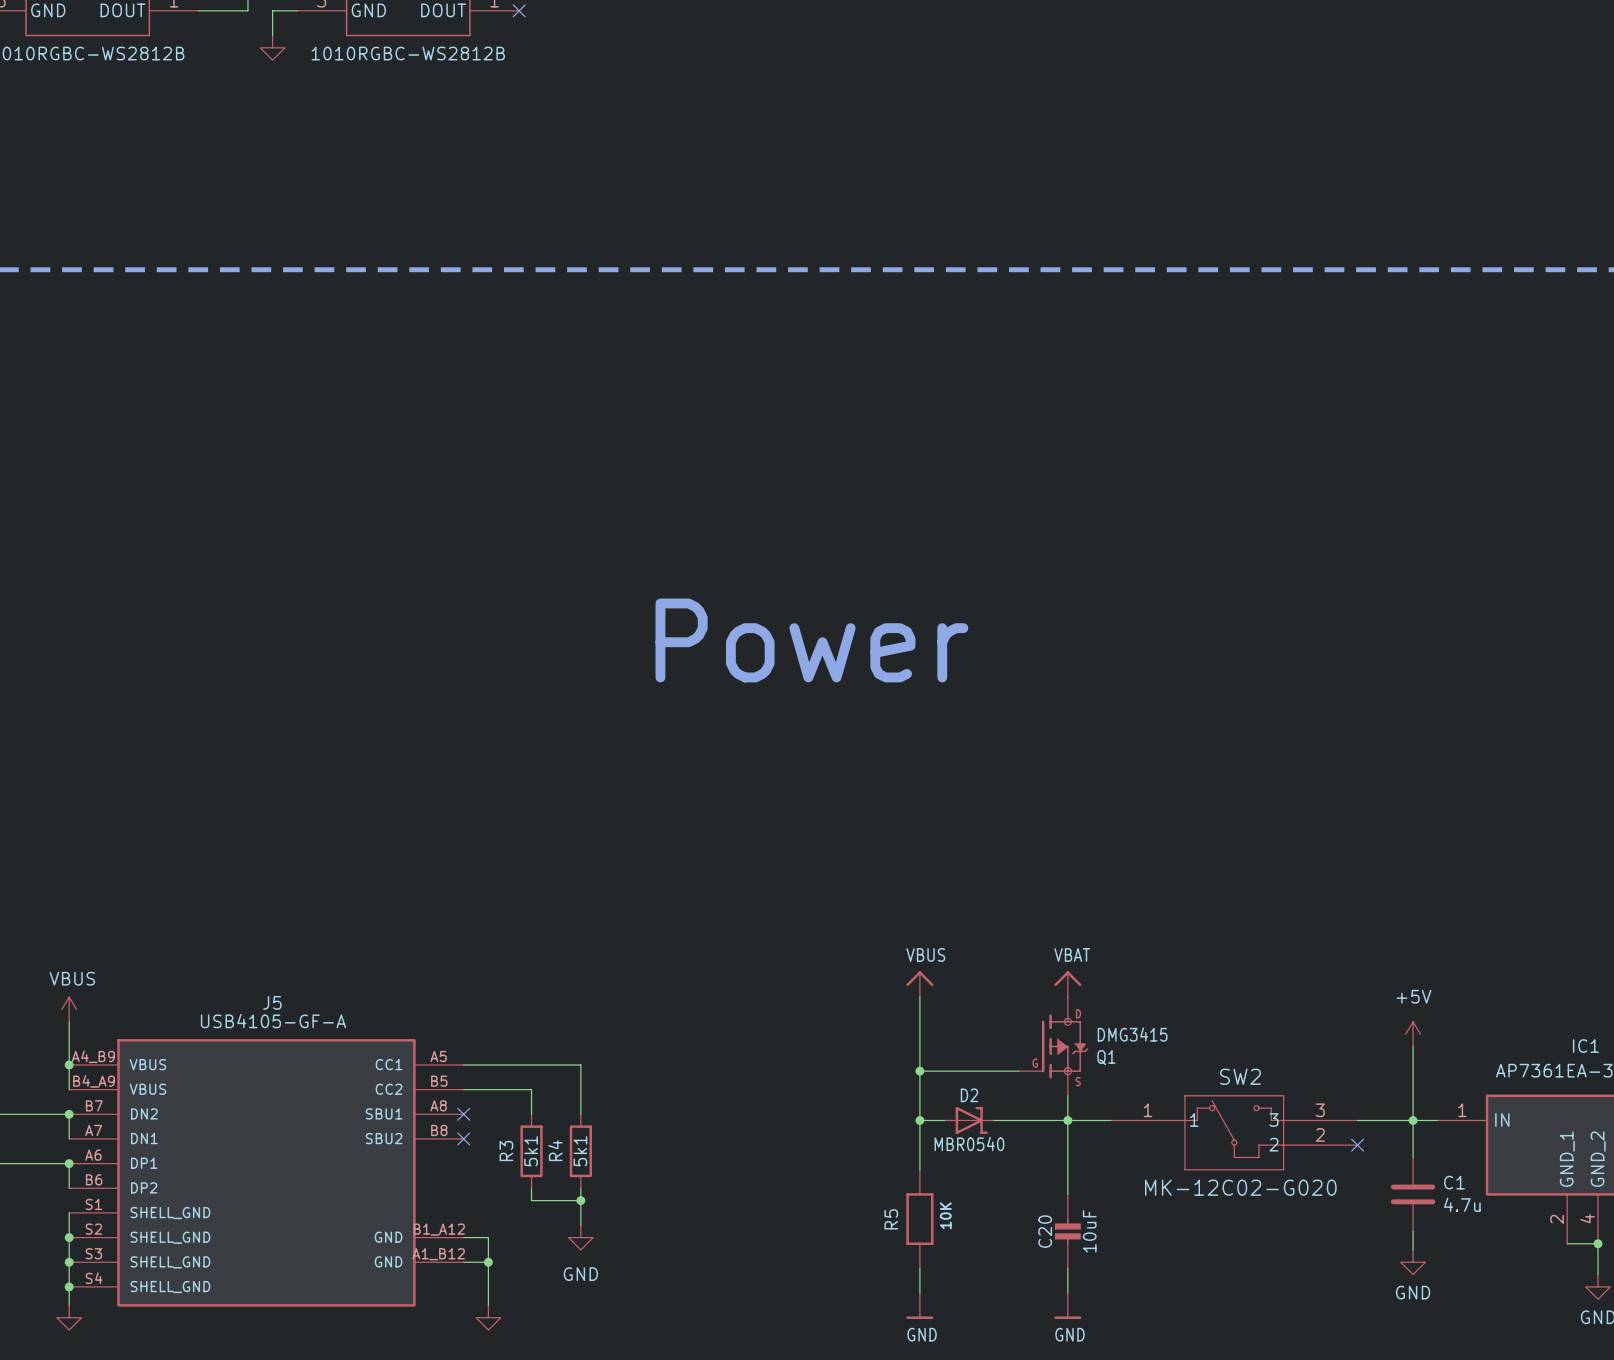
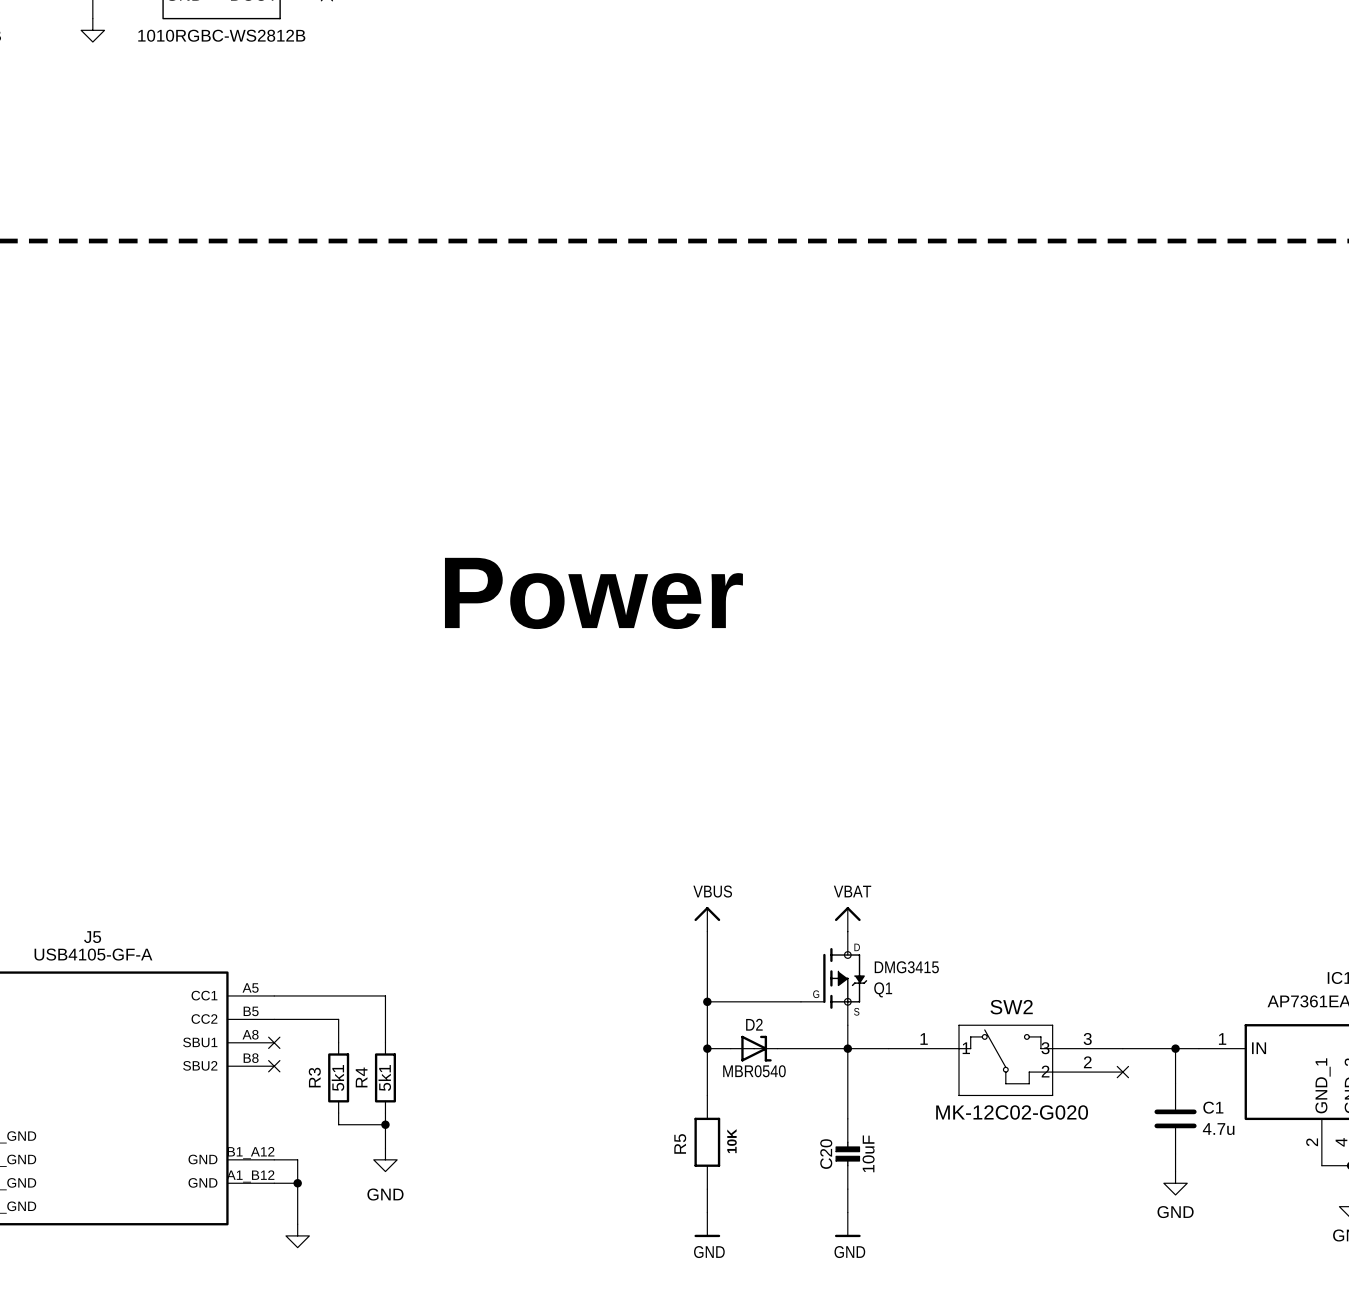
power symbol: +5V (1413, 1034) -> none
wire: (1413, 1046) (1413, 1120) -> none

